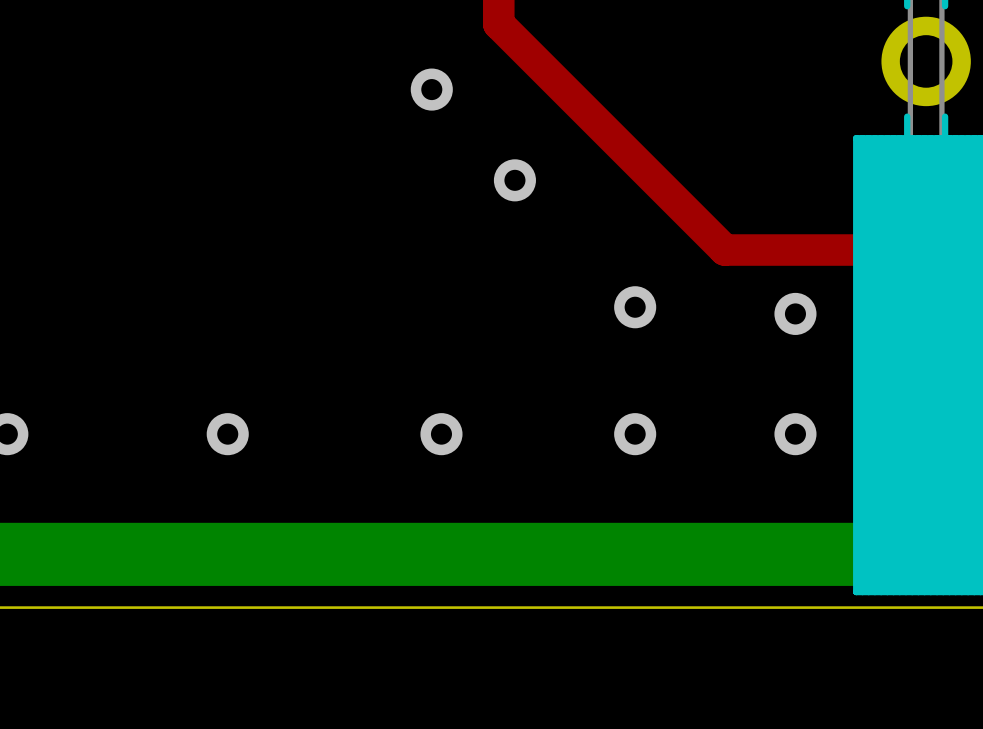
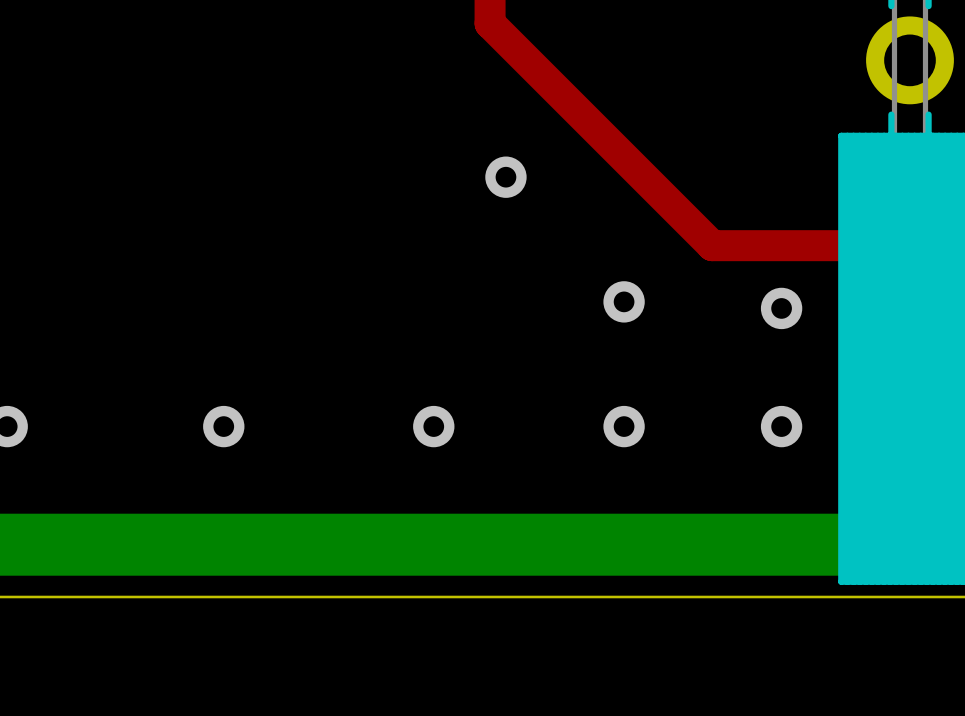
via: (431, 89) -> none

